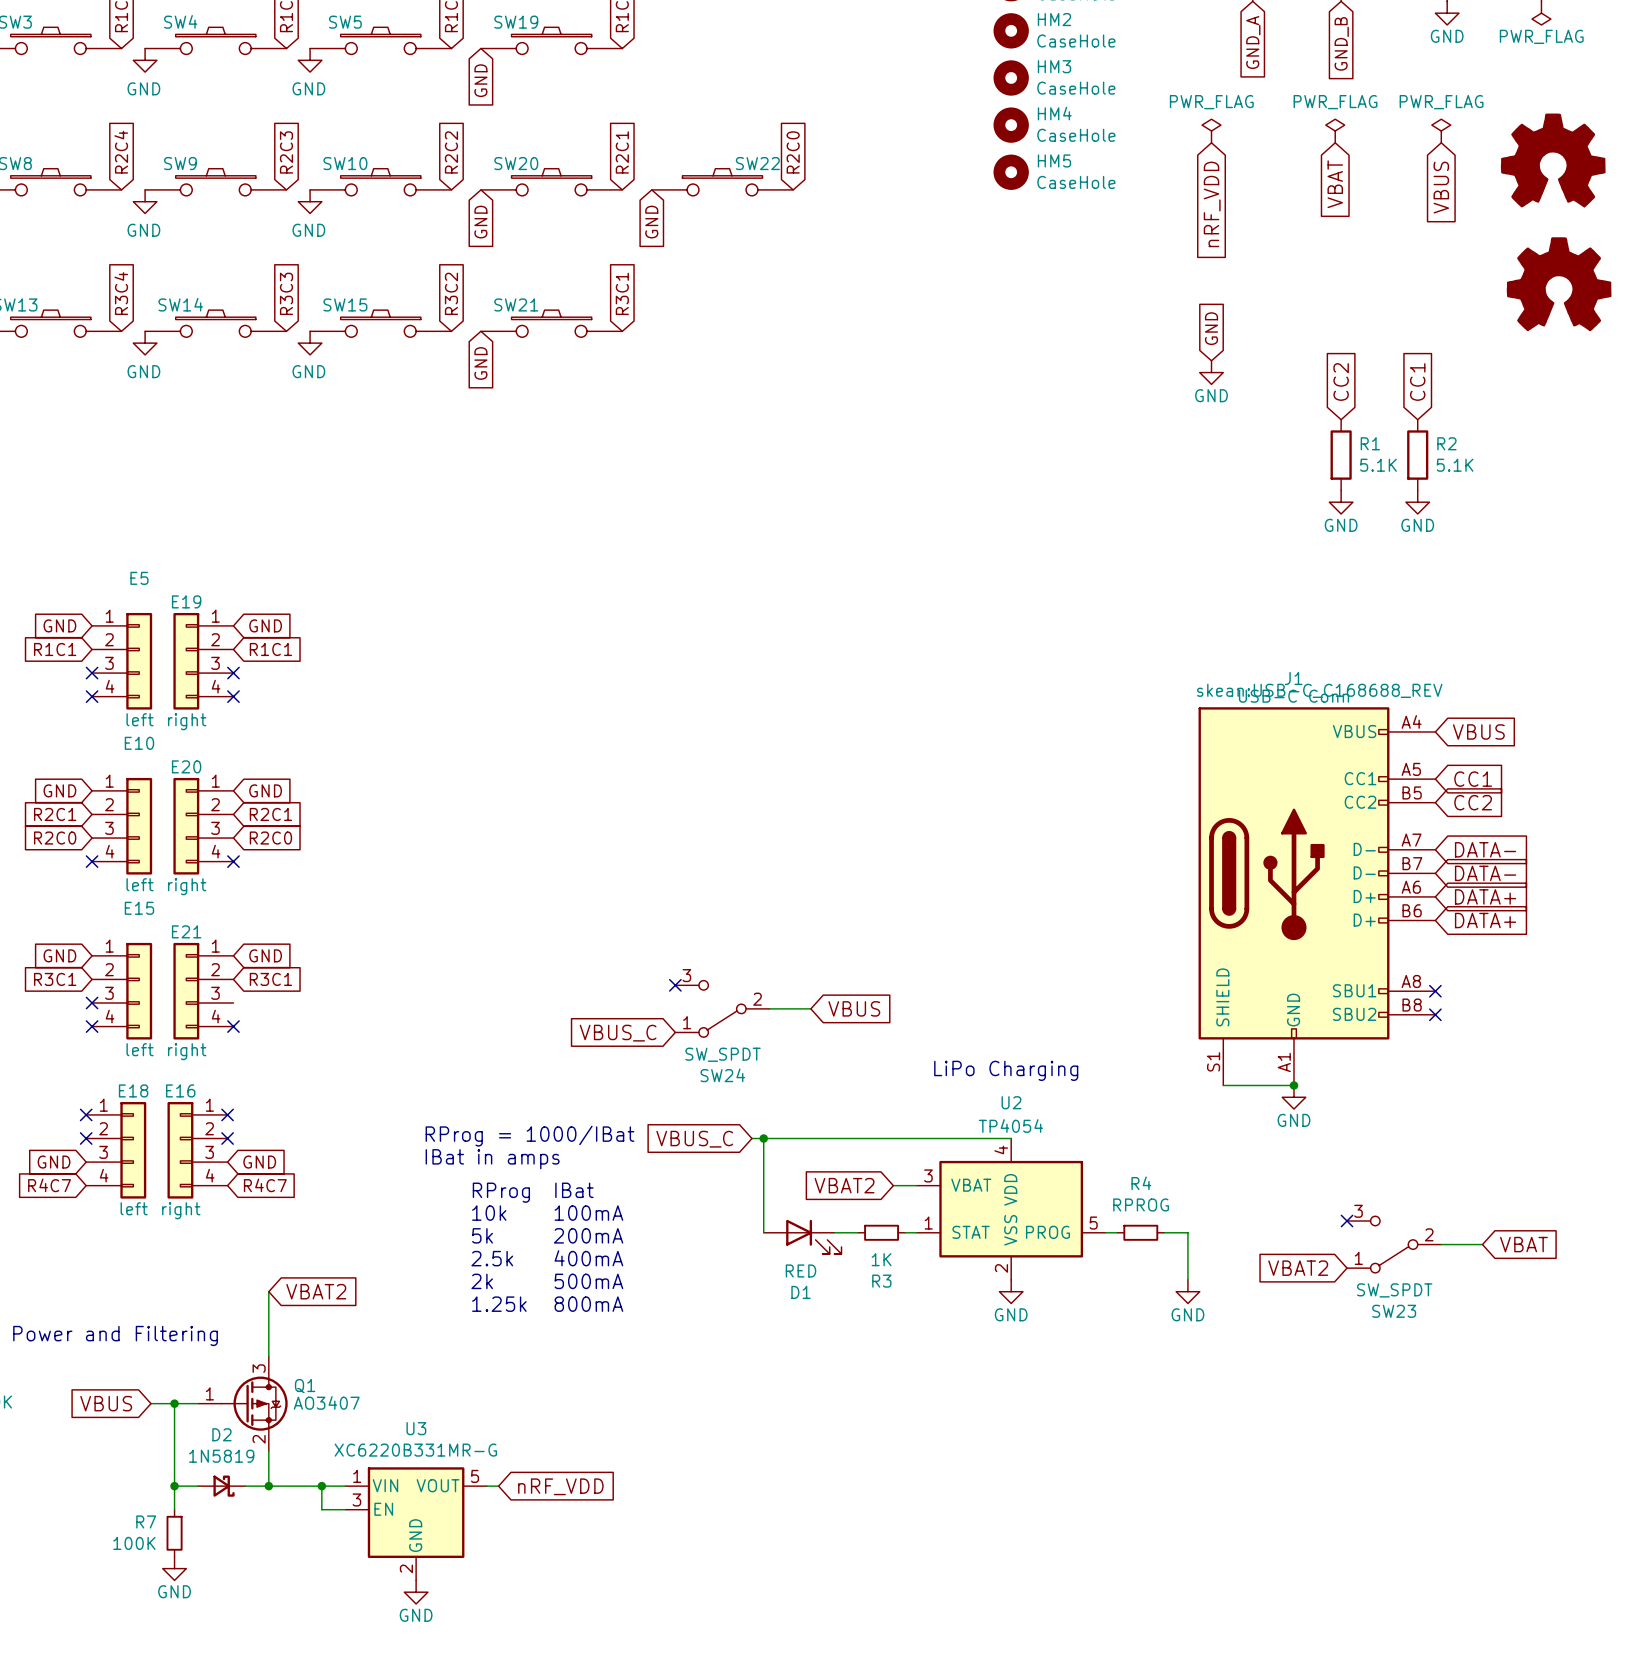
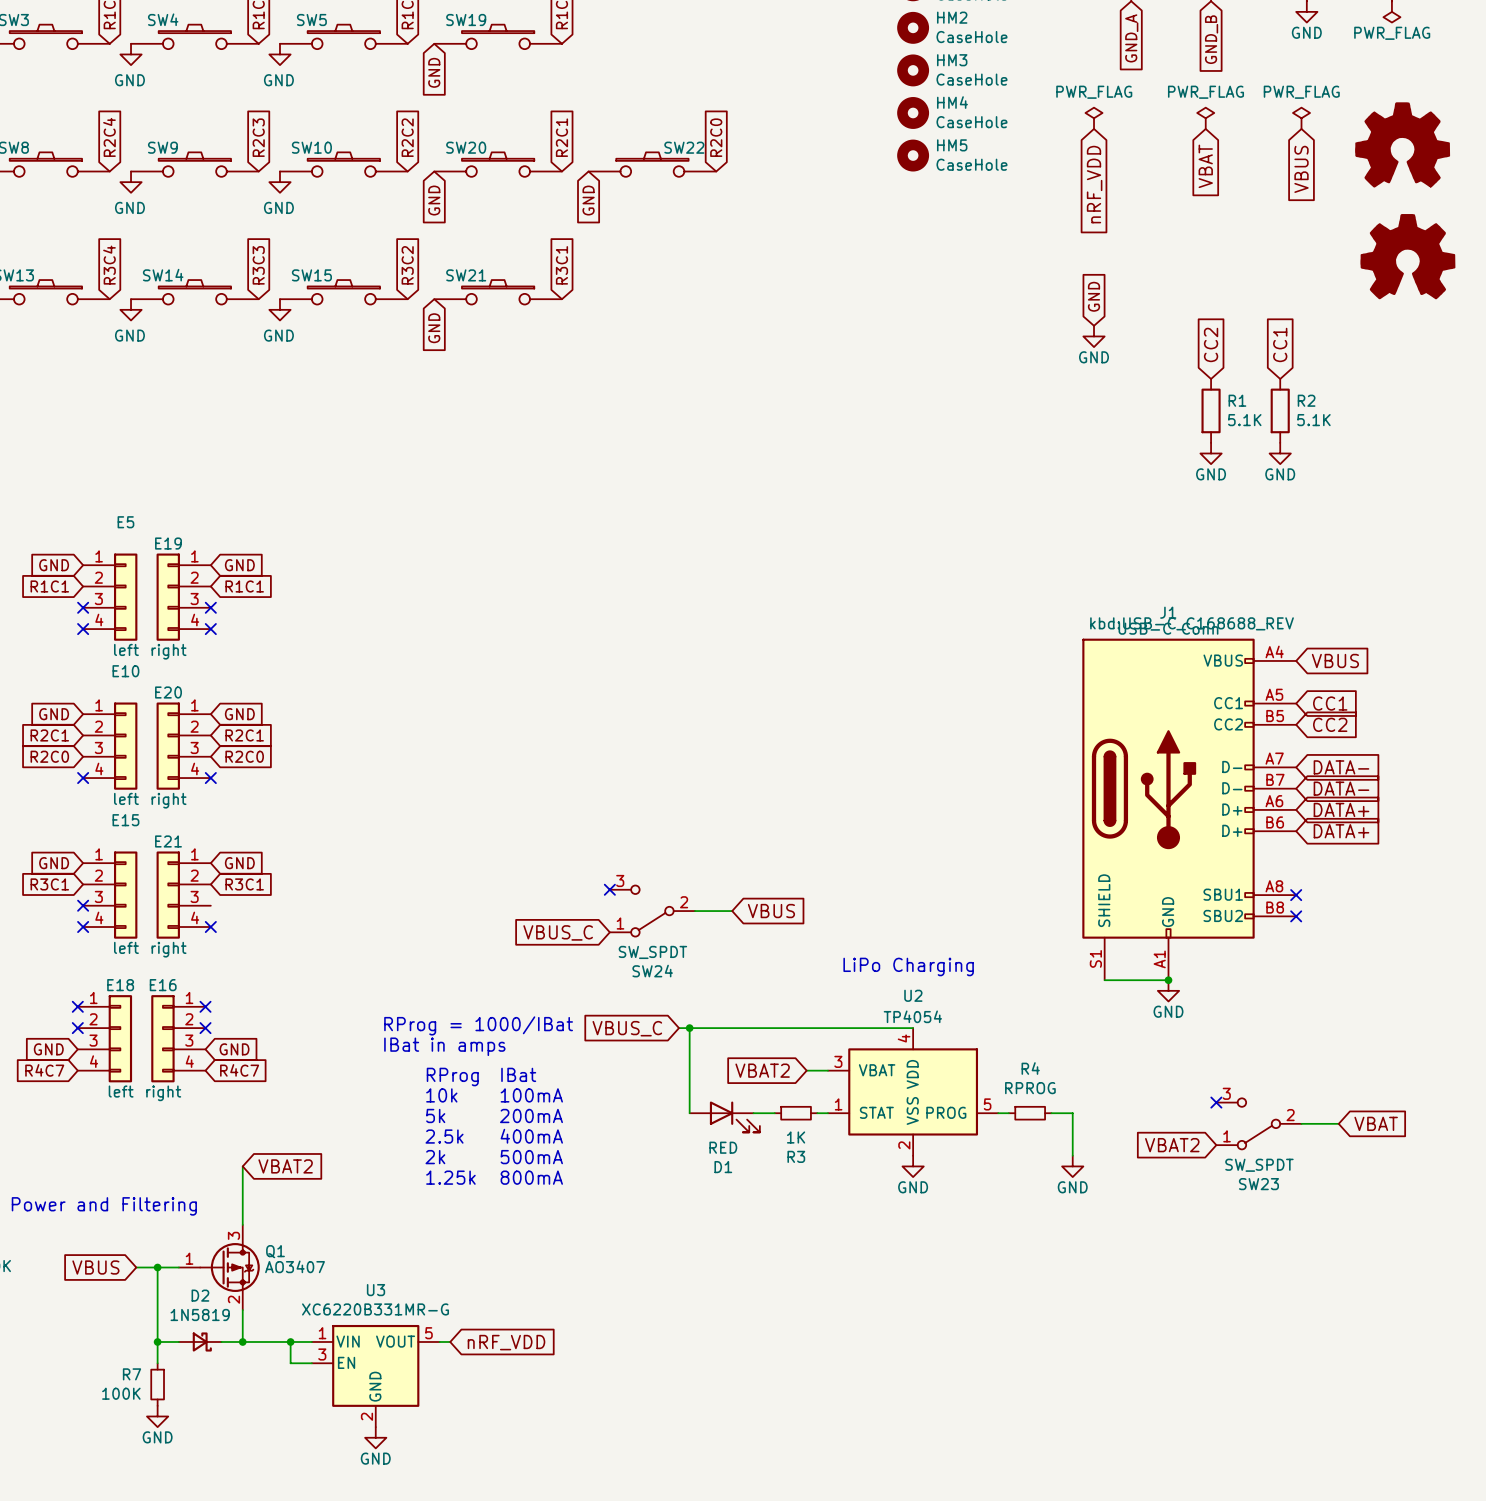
J1 text: skean:USB-C_C168688_REV (1319, 690) -> kbd:USB-C_C168688_REV (1192, 623)

